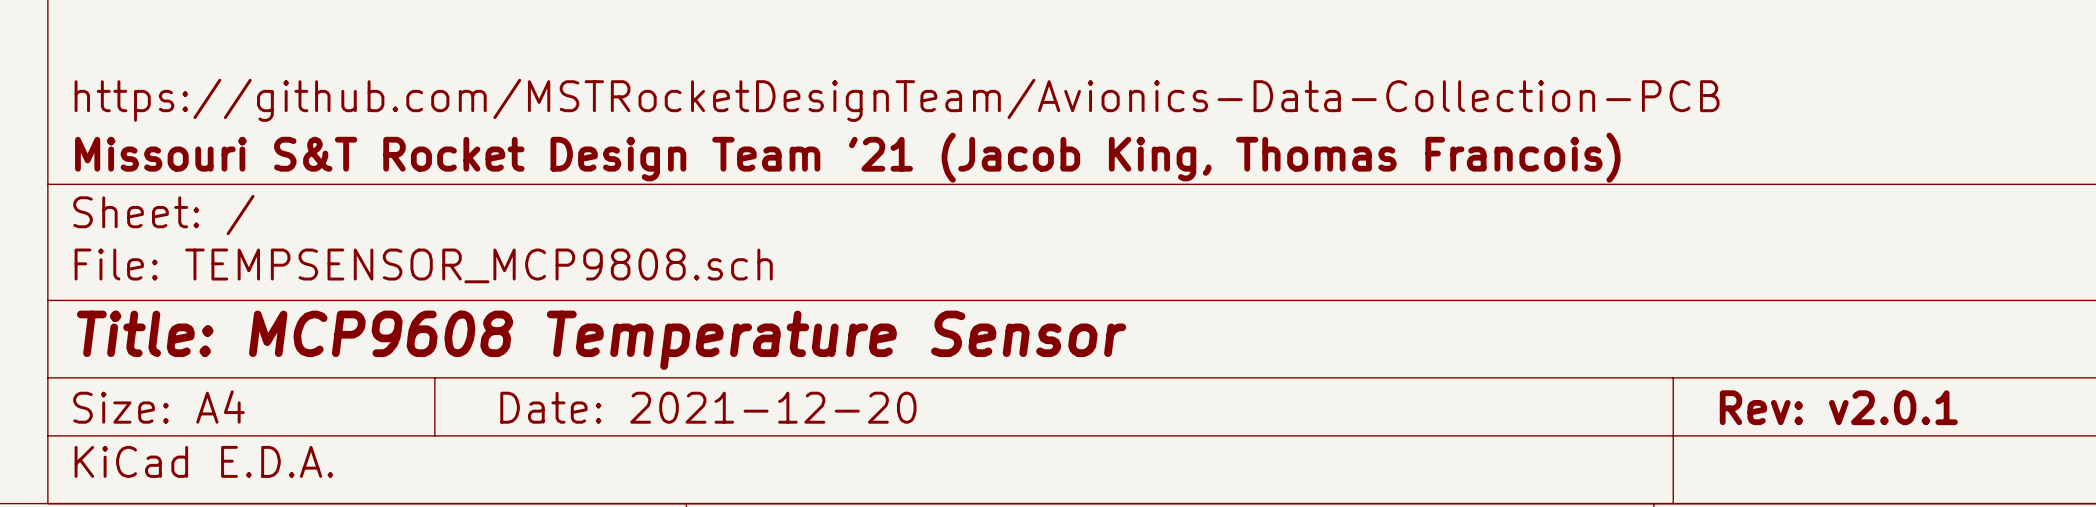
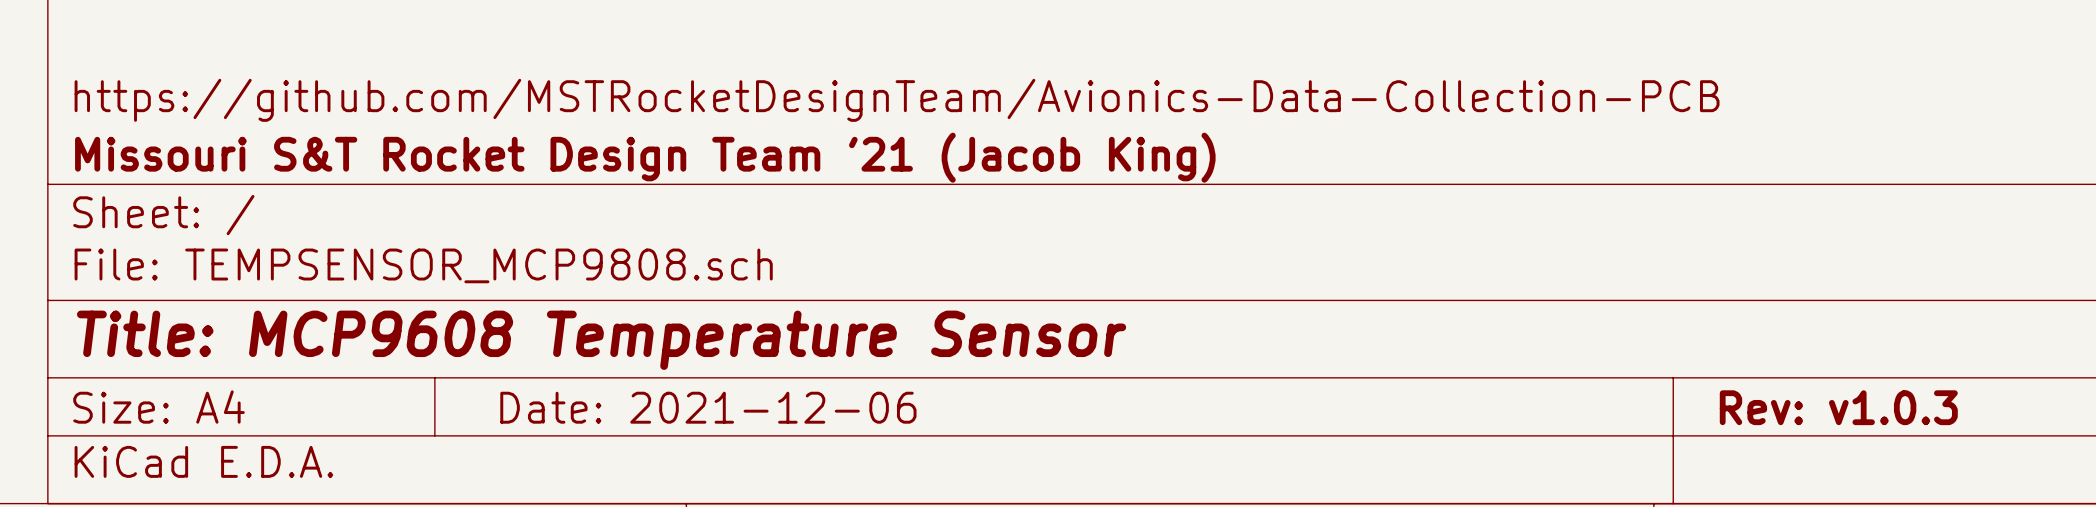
title block: Missouri S&T Rocket Design Team '21 (Jacob King, Thomas Francois) (847, 157) -> Missouri S&T Rocket Design Team '21 (Jacob King) (645, 157)
title block: Date: 2021-12-20 (708, 407) -> Date: 2021-12-06 (708, 407)
title block: Rev: v2.0.1 (1838, 407) -> Rev: v1.0.3 (1838, 407)

